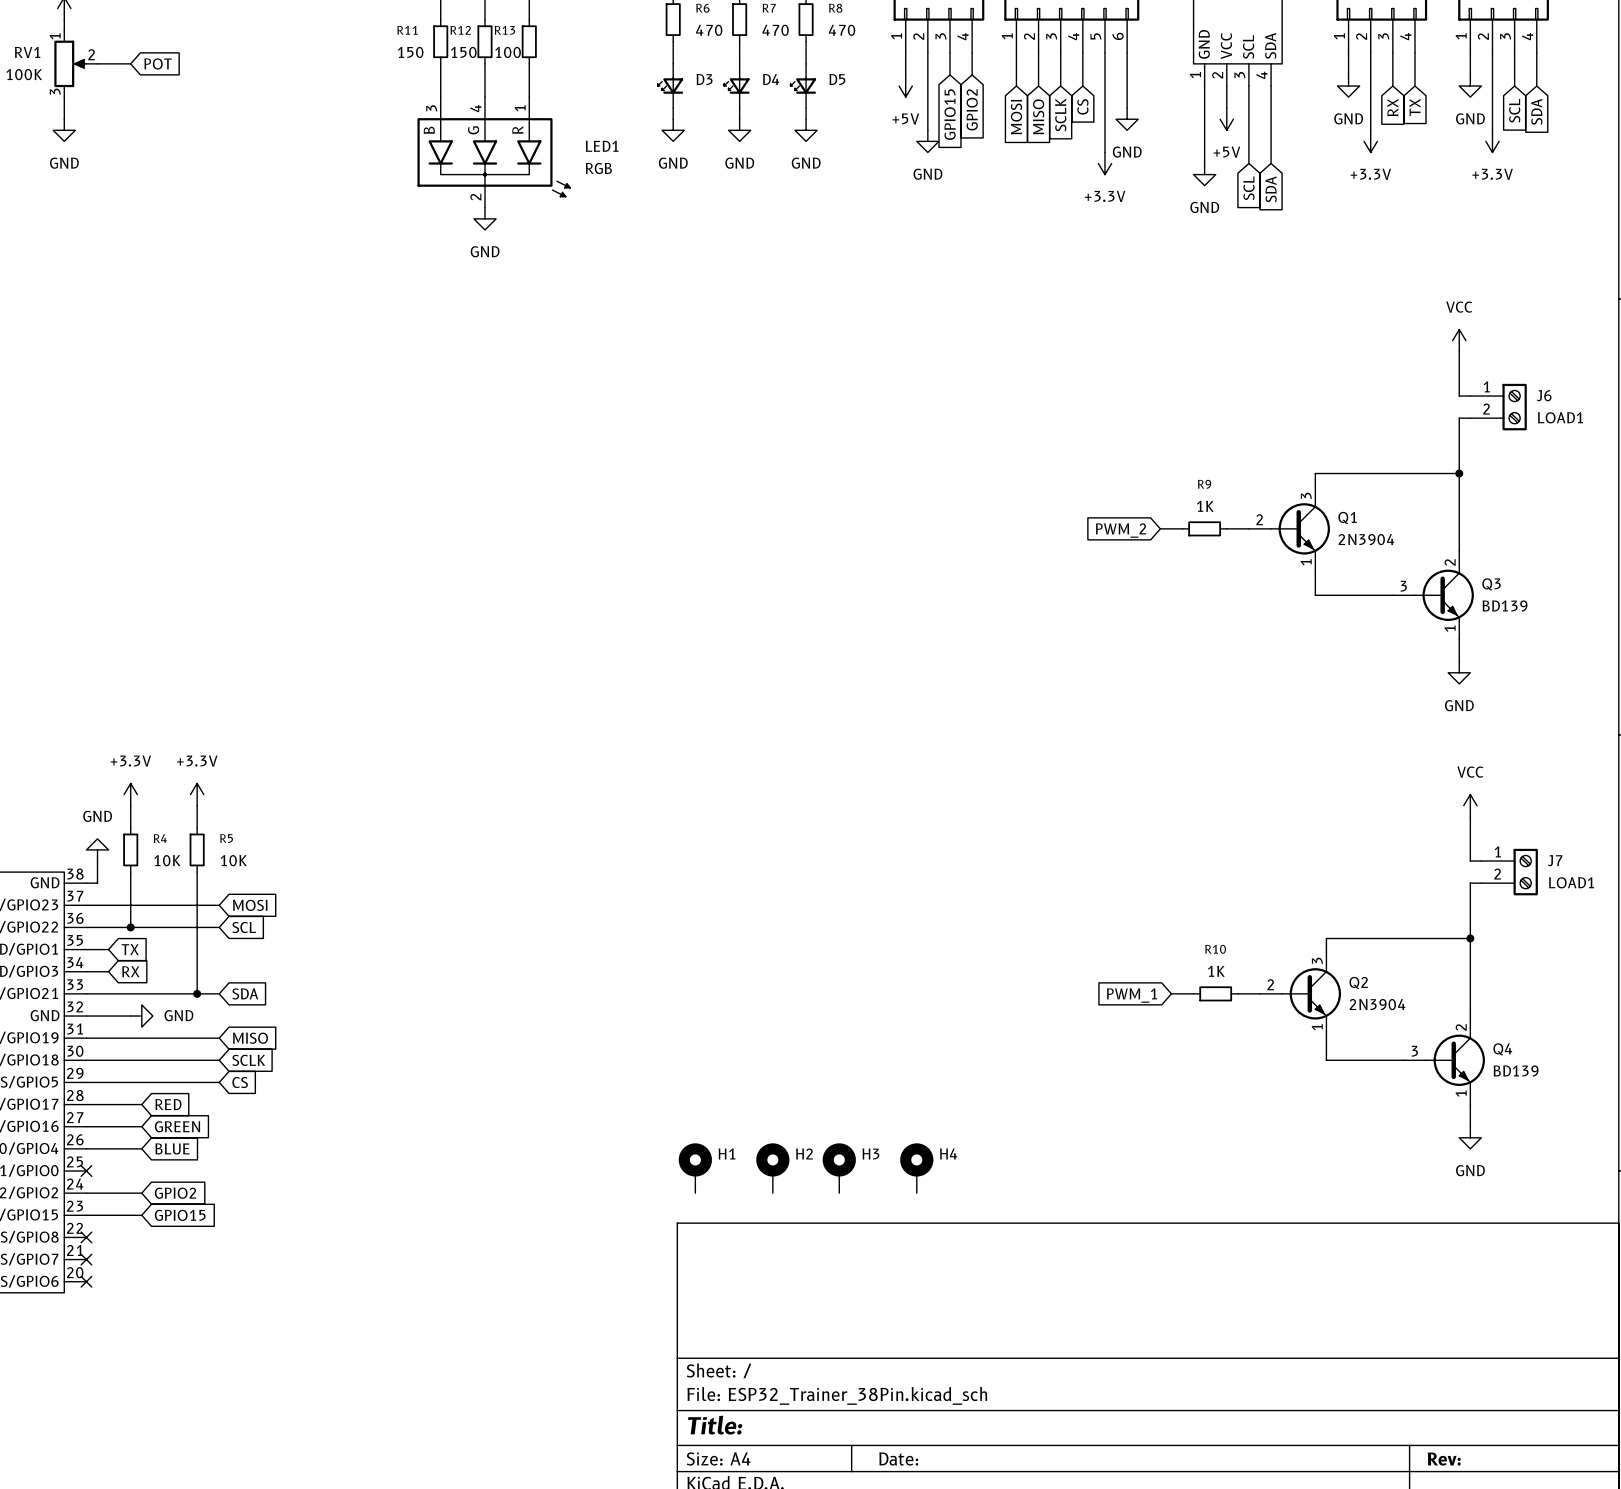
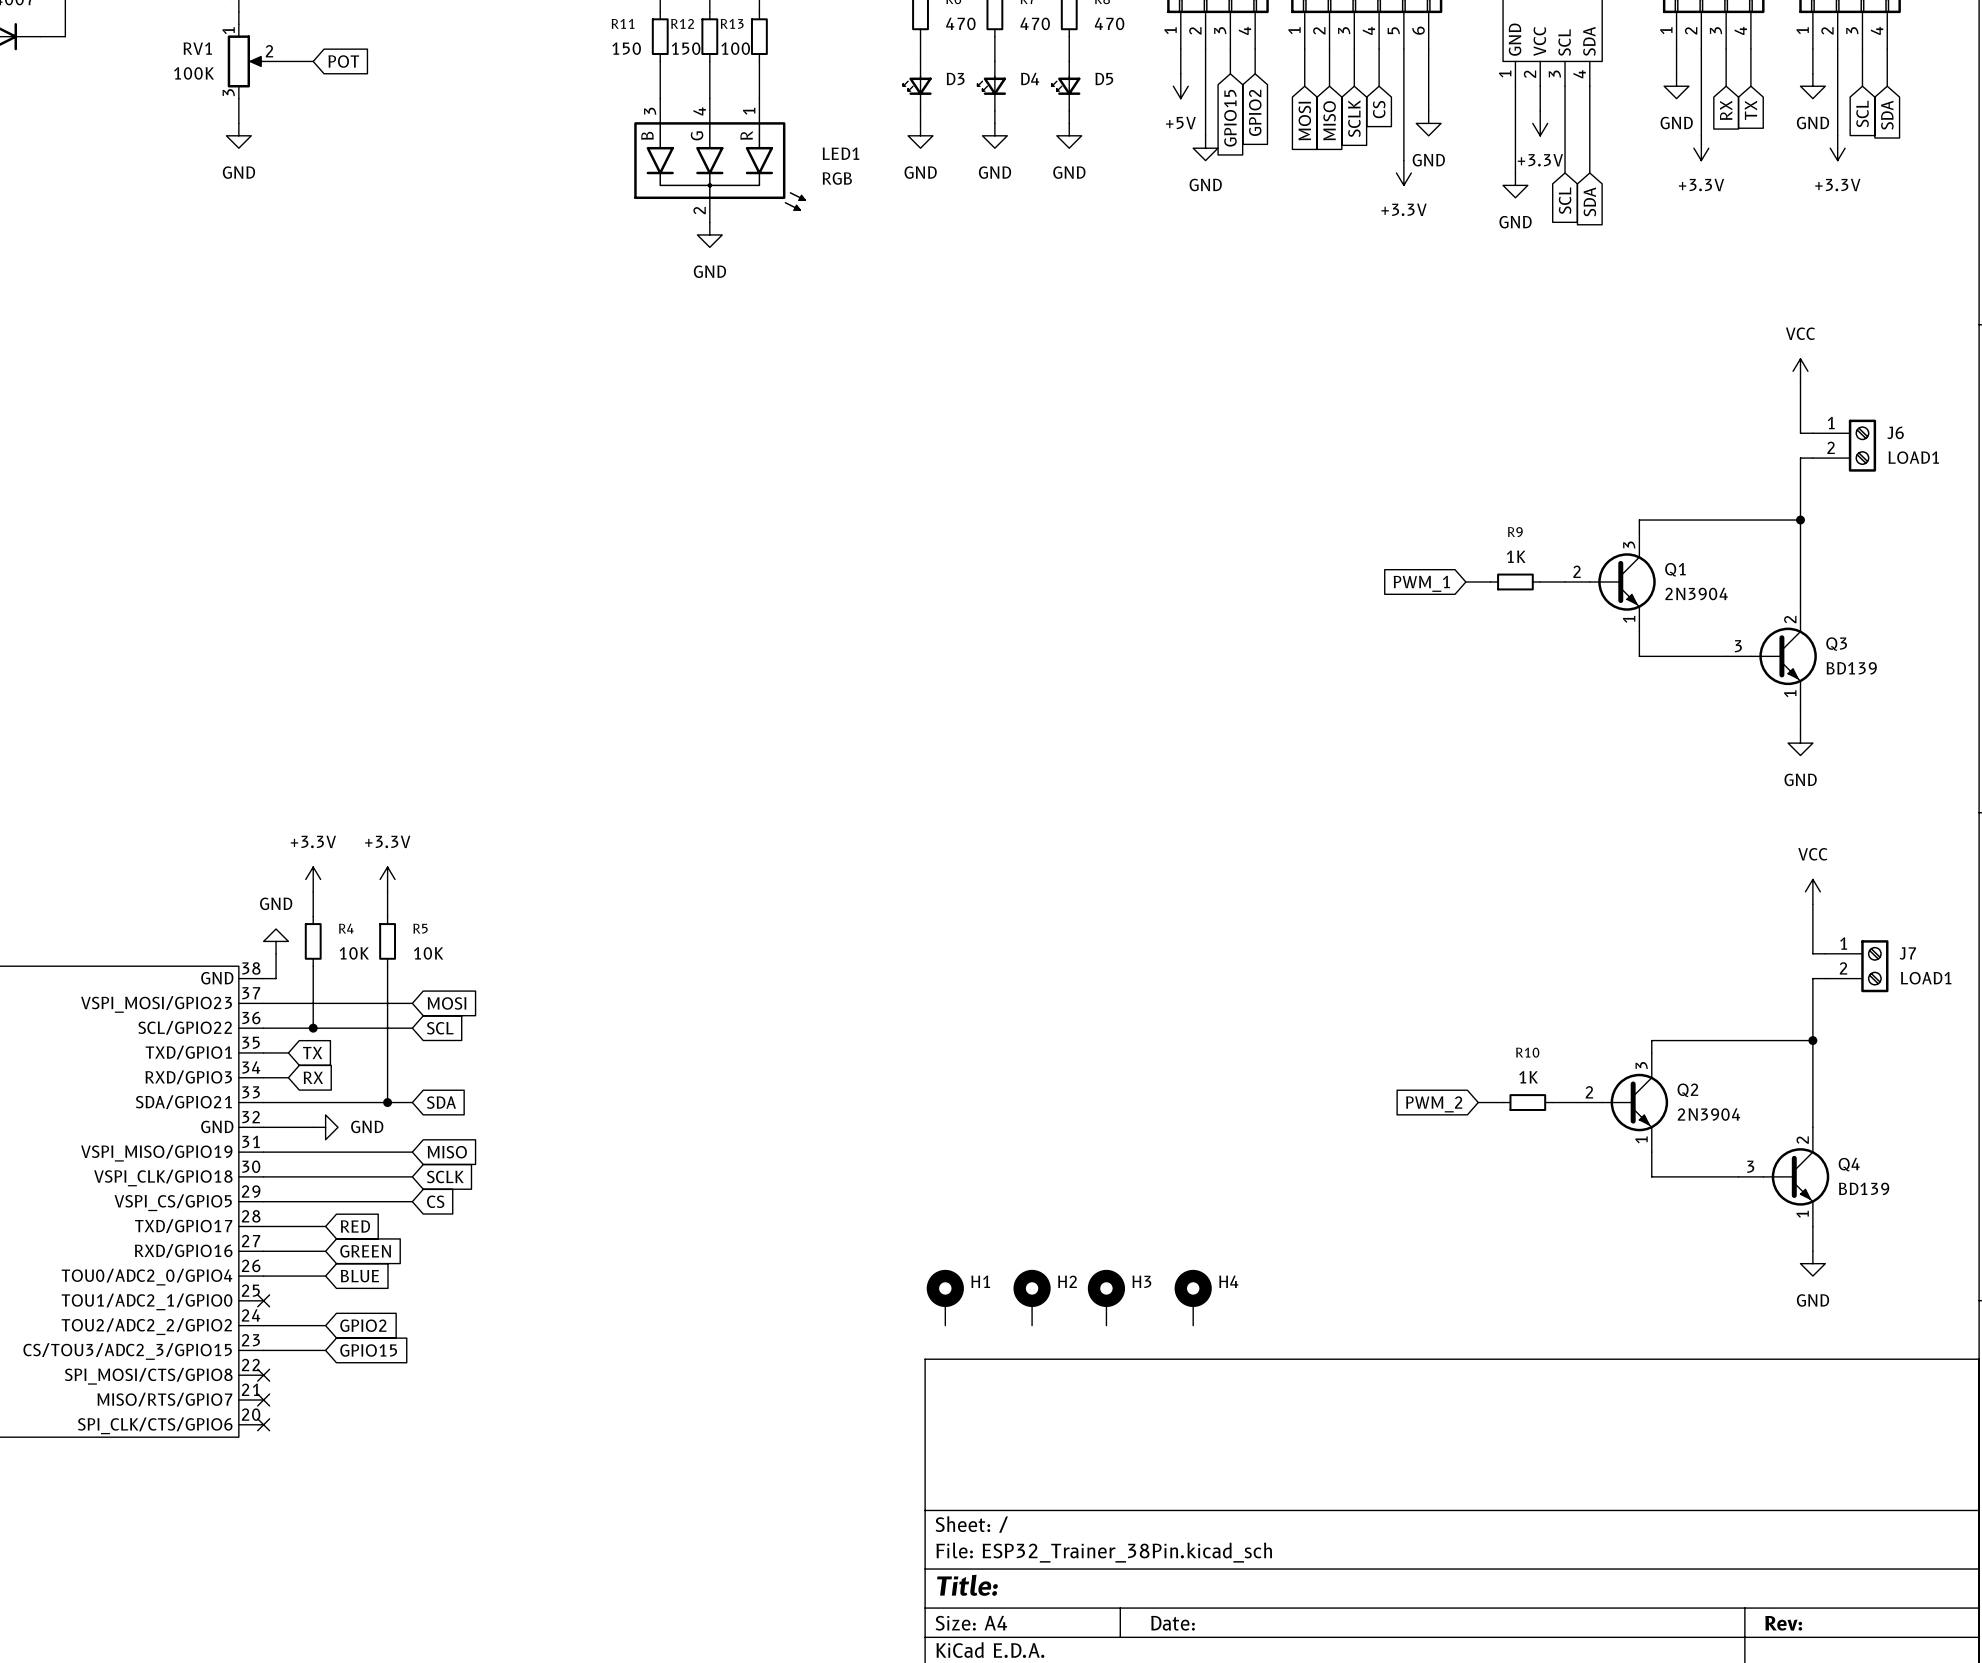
power symbol: +5V (1226, 119) -> +3.3V (1540, 123)
global label: PWM_2 (1120, 530) -> PWM_1 (1421, 583)
global label: PWM_1 (1132, 995) -> PWM_2 (1434, 1104)

